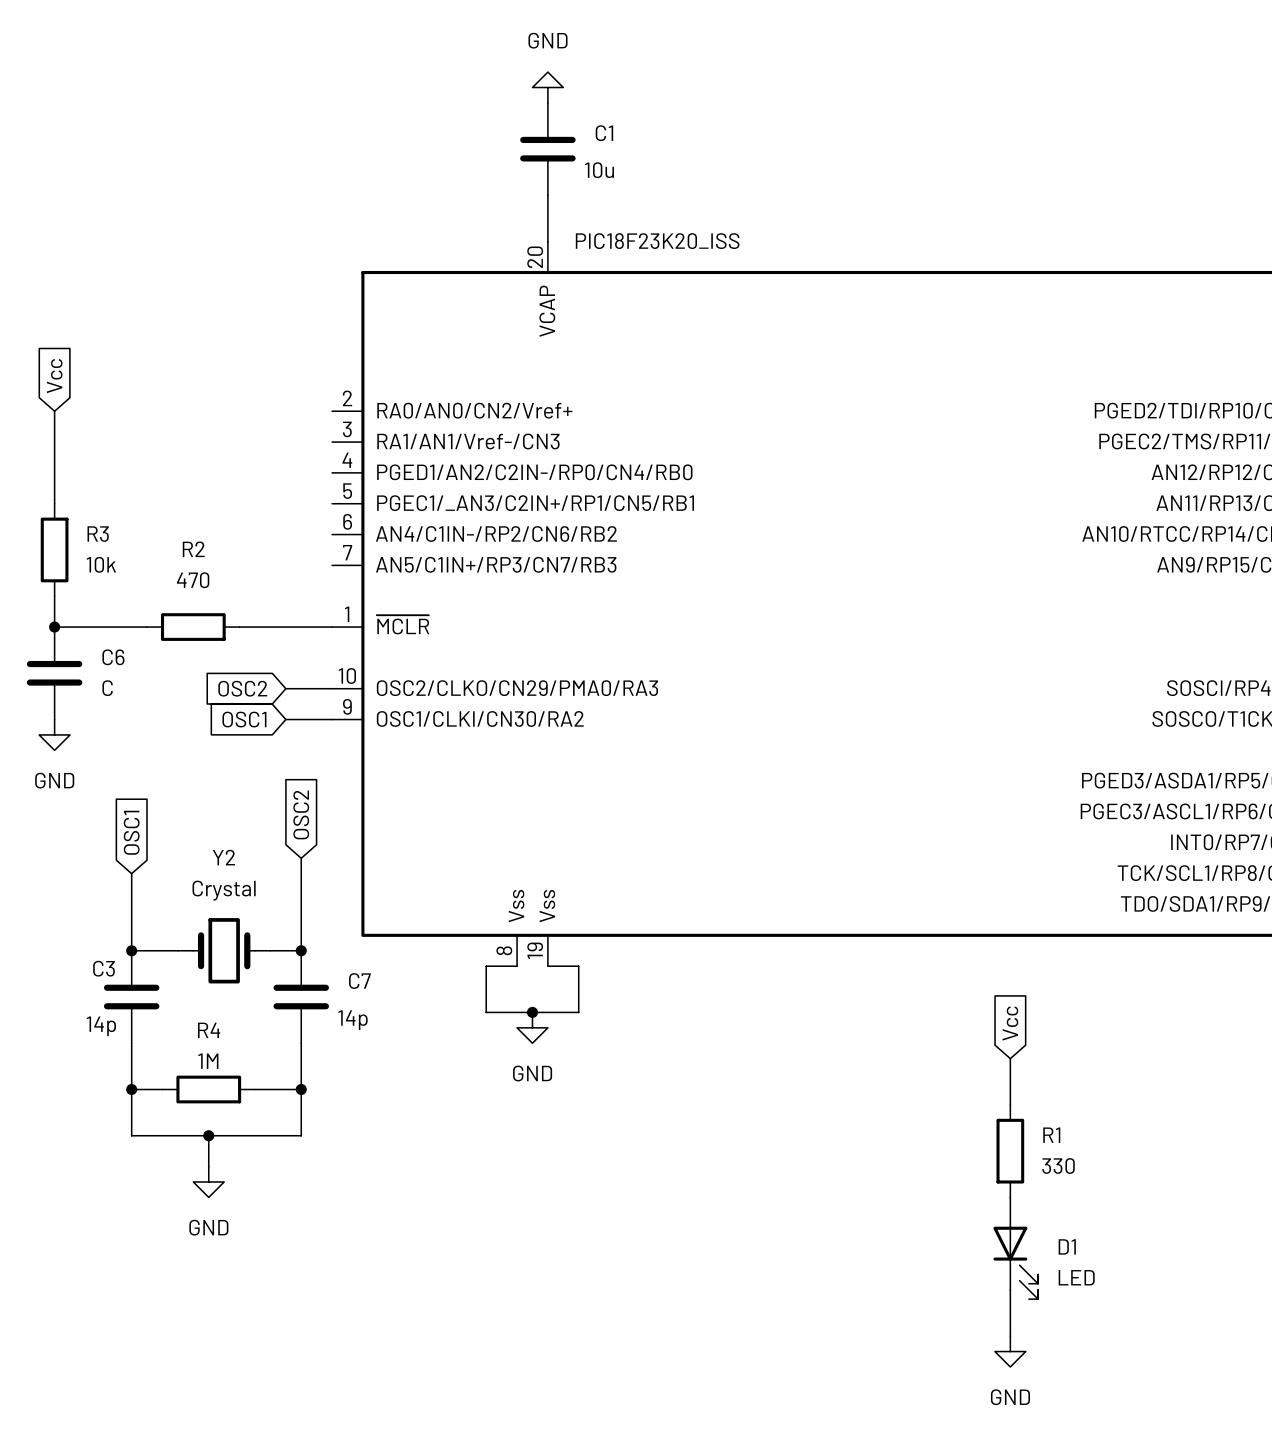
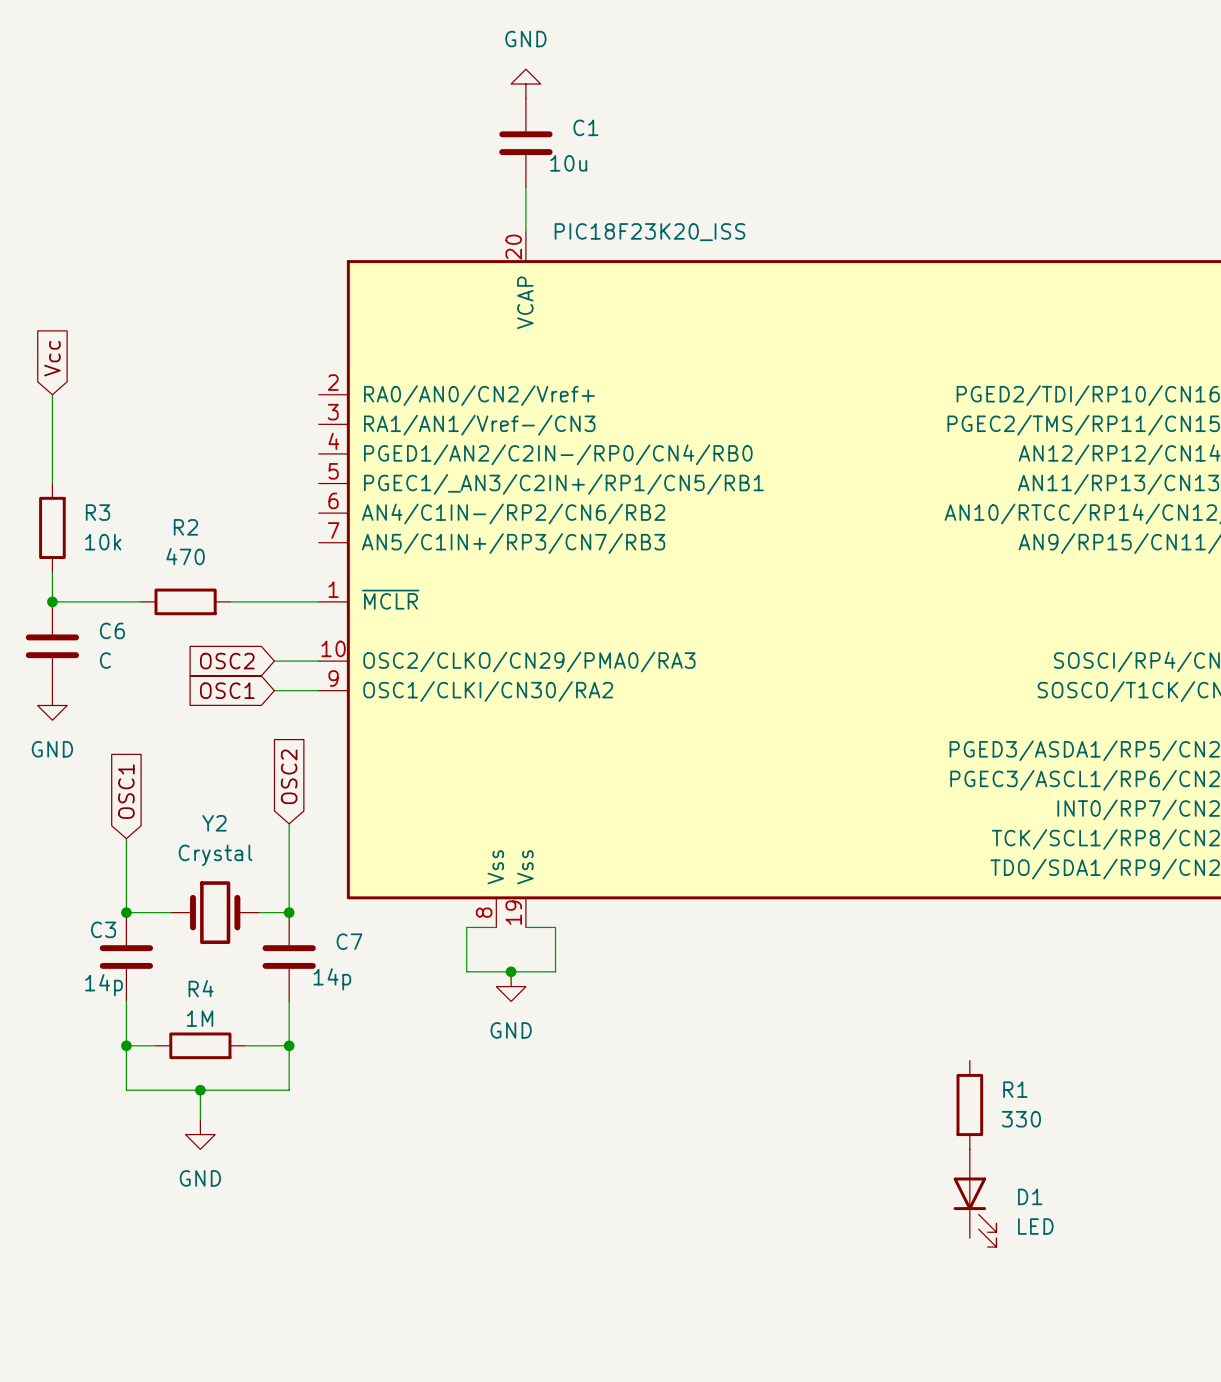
global label: Vcc (1010, 1023) -> none
wire: (1010, 1058) (1010, 1104) -> none
wire: (1010, 1289) (1010, 1336) -> none
power symbol: GND (1010, 1351) -> none

